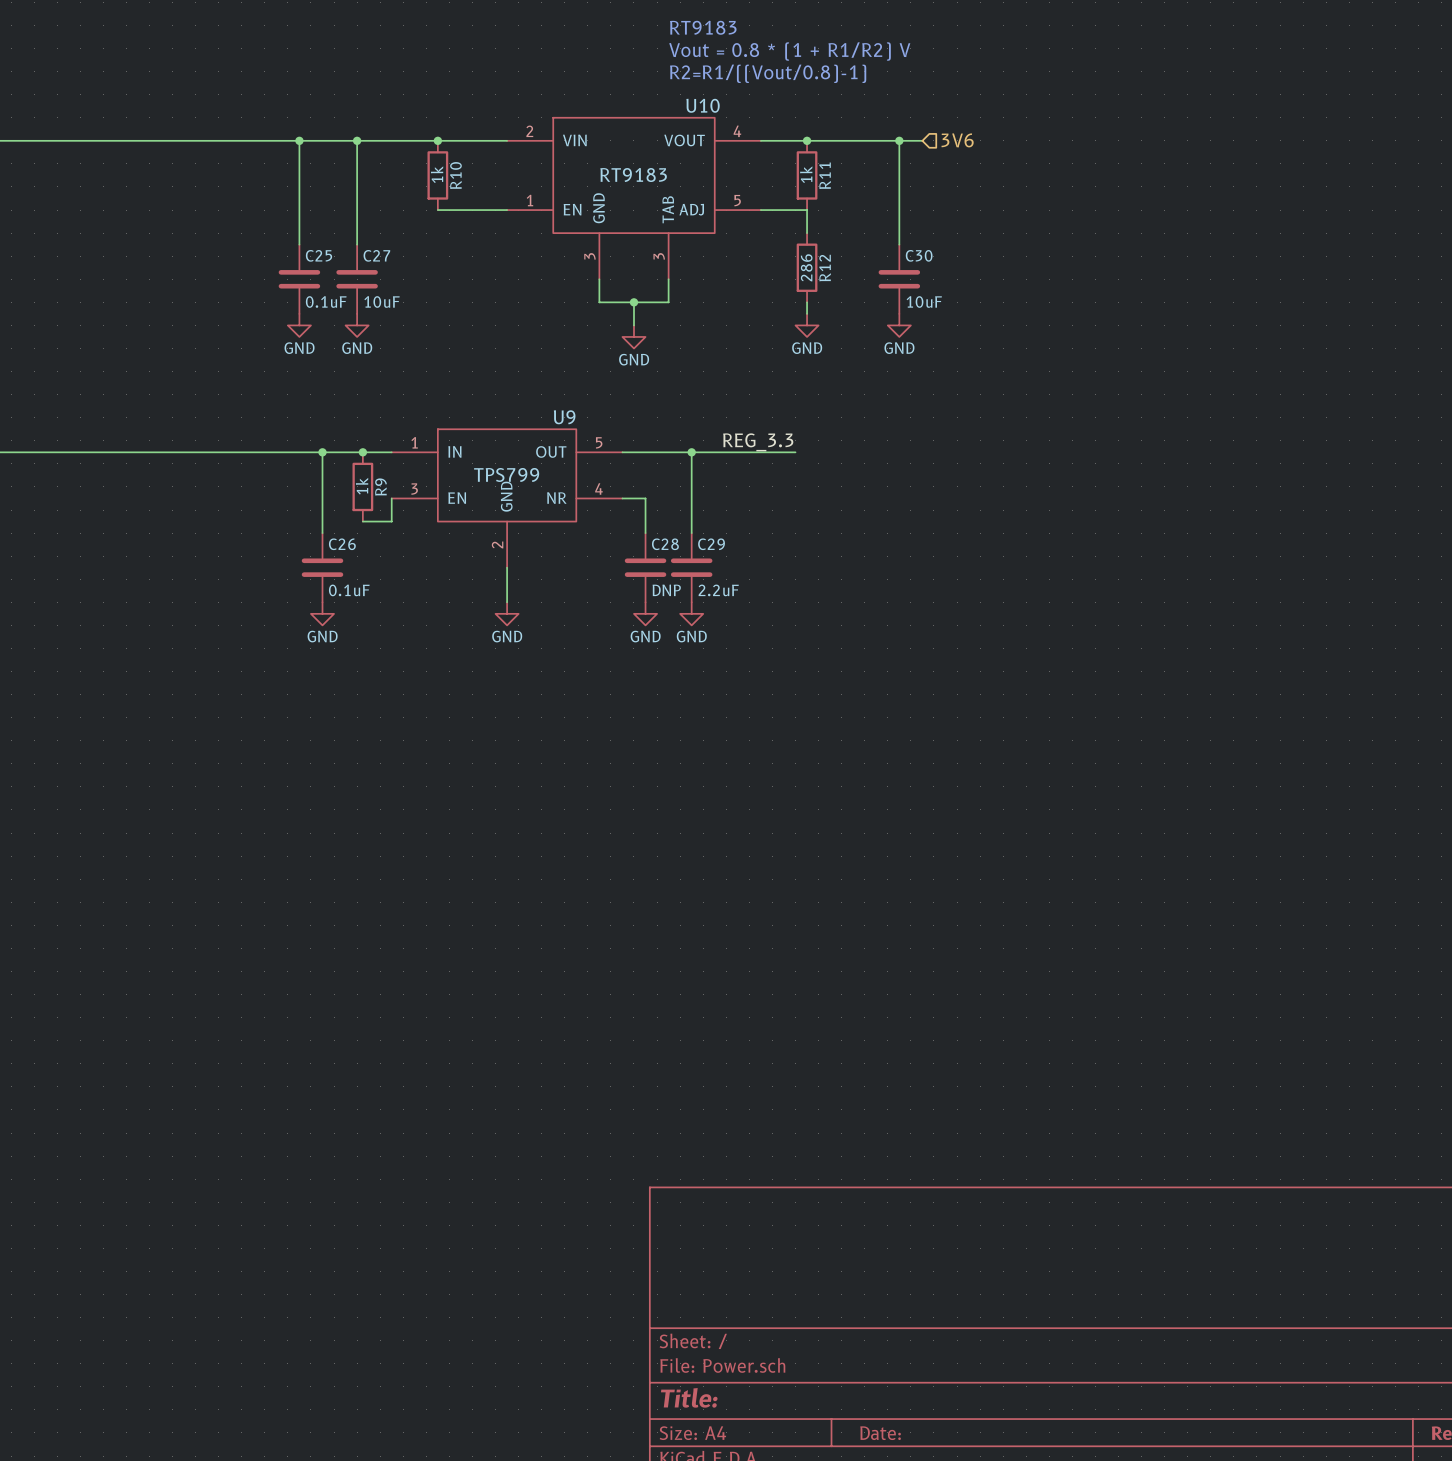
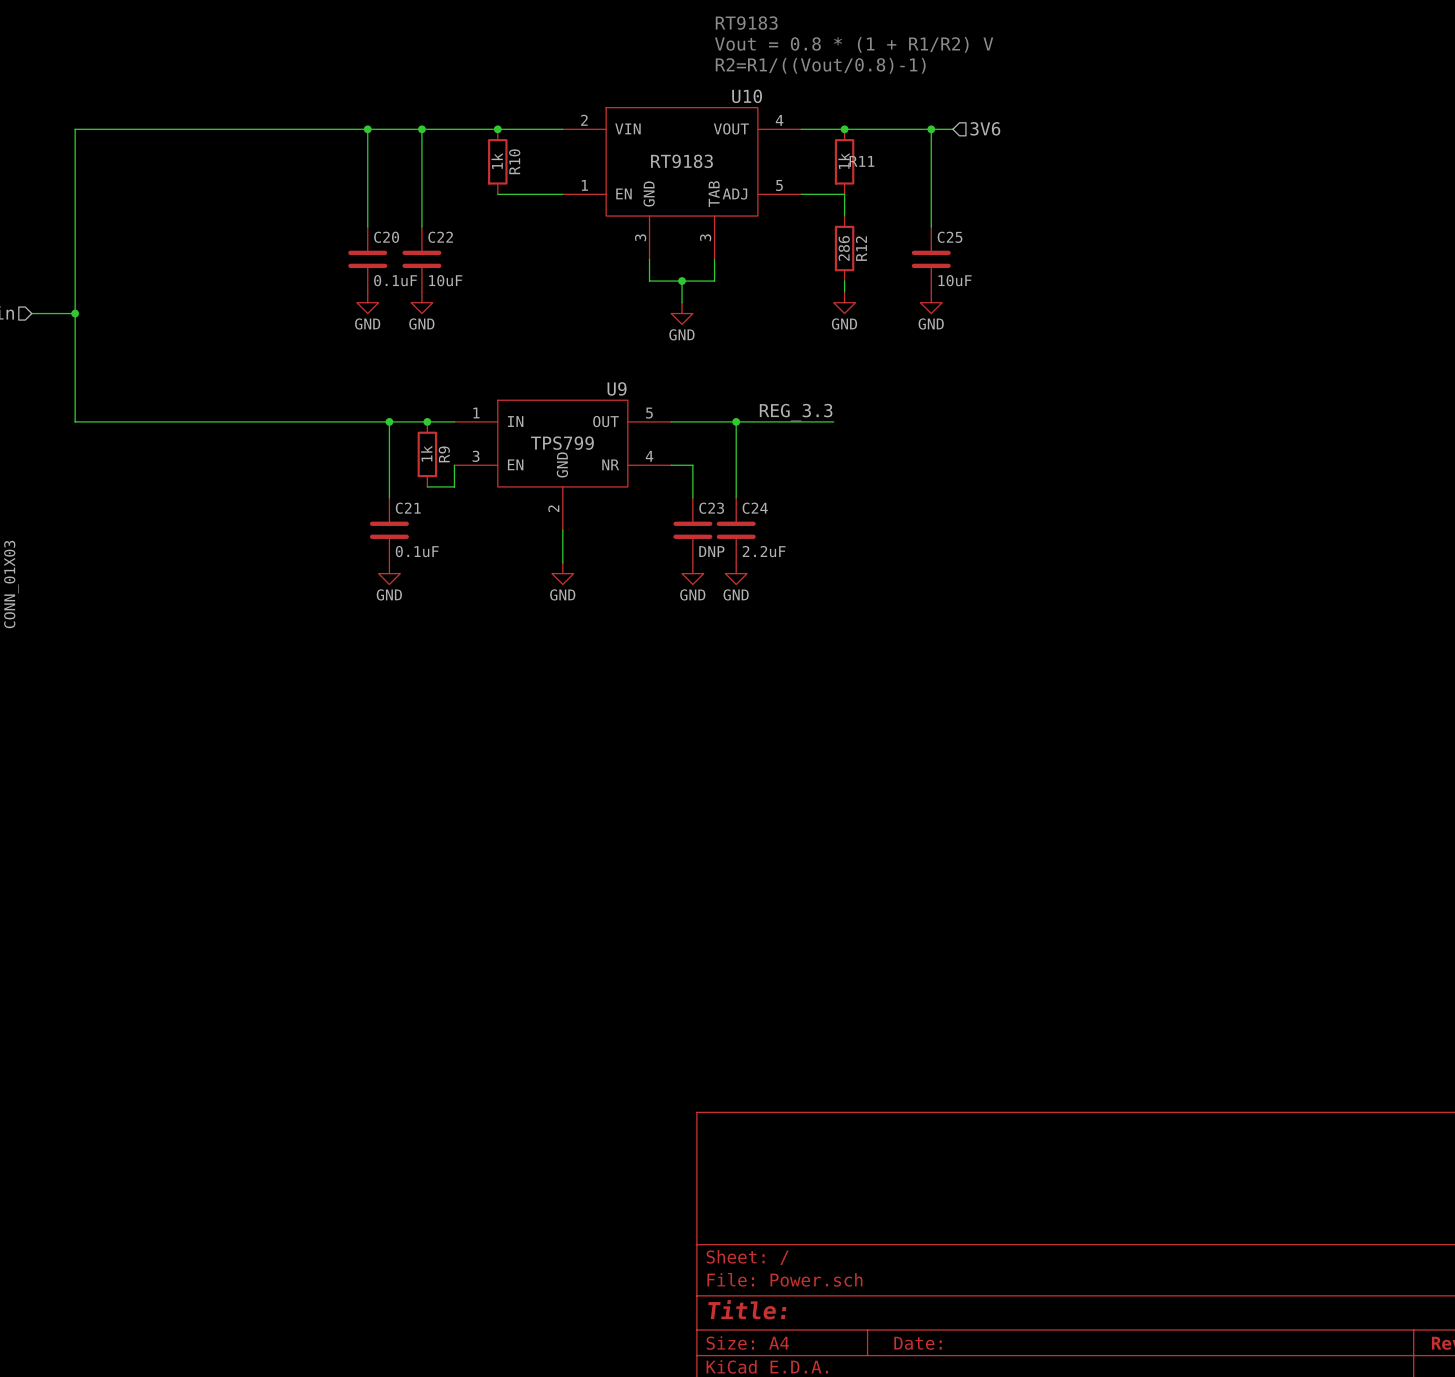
R11 name rotation: 0° (825, 175) -> 90° clockwise (861, 161)
C25 name: C25 (319, 255) -> C20 (386, 237)
C27 name: C27 (376, 255) -> C22 (440, 237)
C30 name: C30 (919, 255) -> C25 (950, 237)
C26 name: C26 (342, 544) -> C21 (408, 508)
C28 name: C28 (665, 544) -> C23 (711, 508)
C29 name: C29 (711, 544) -> C24 (755, 508)

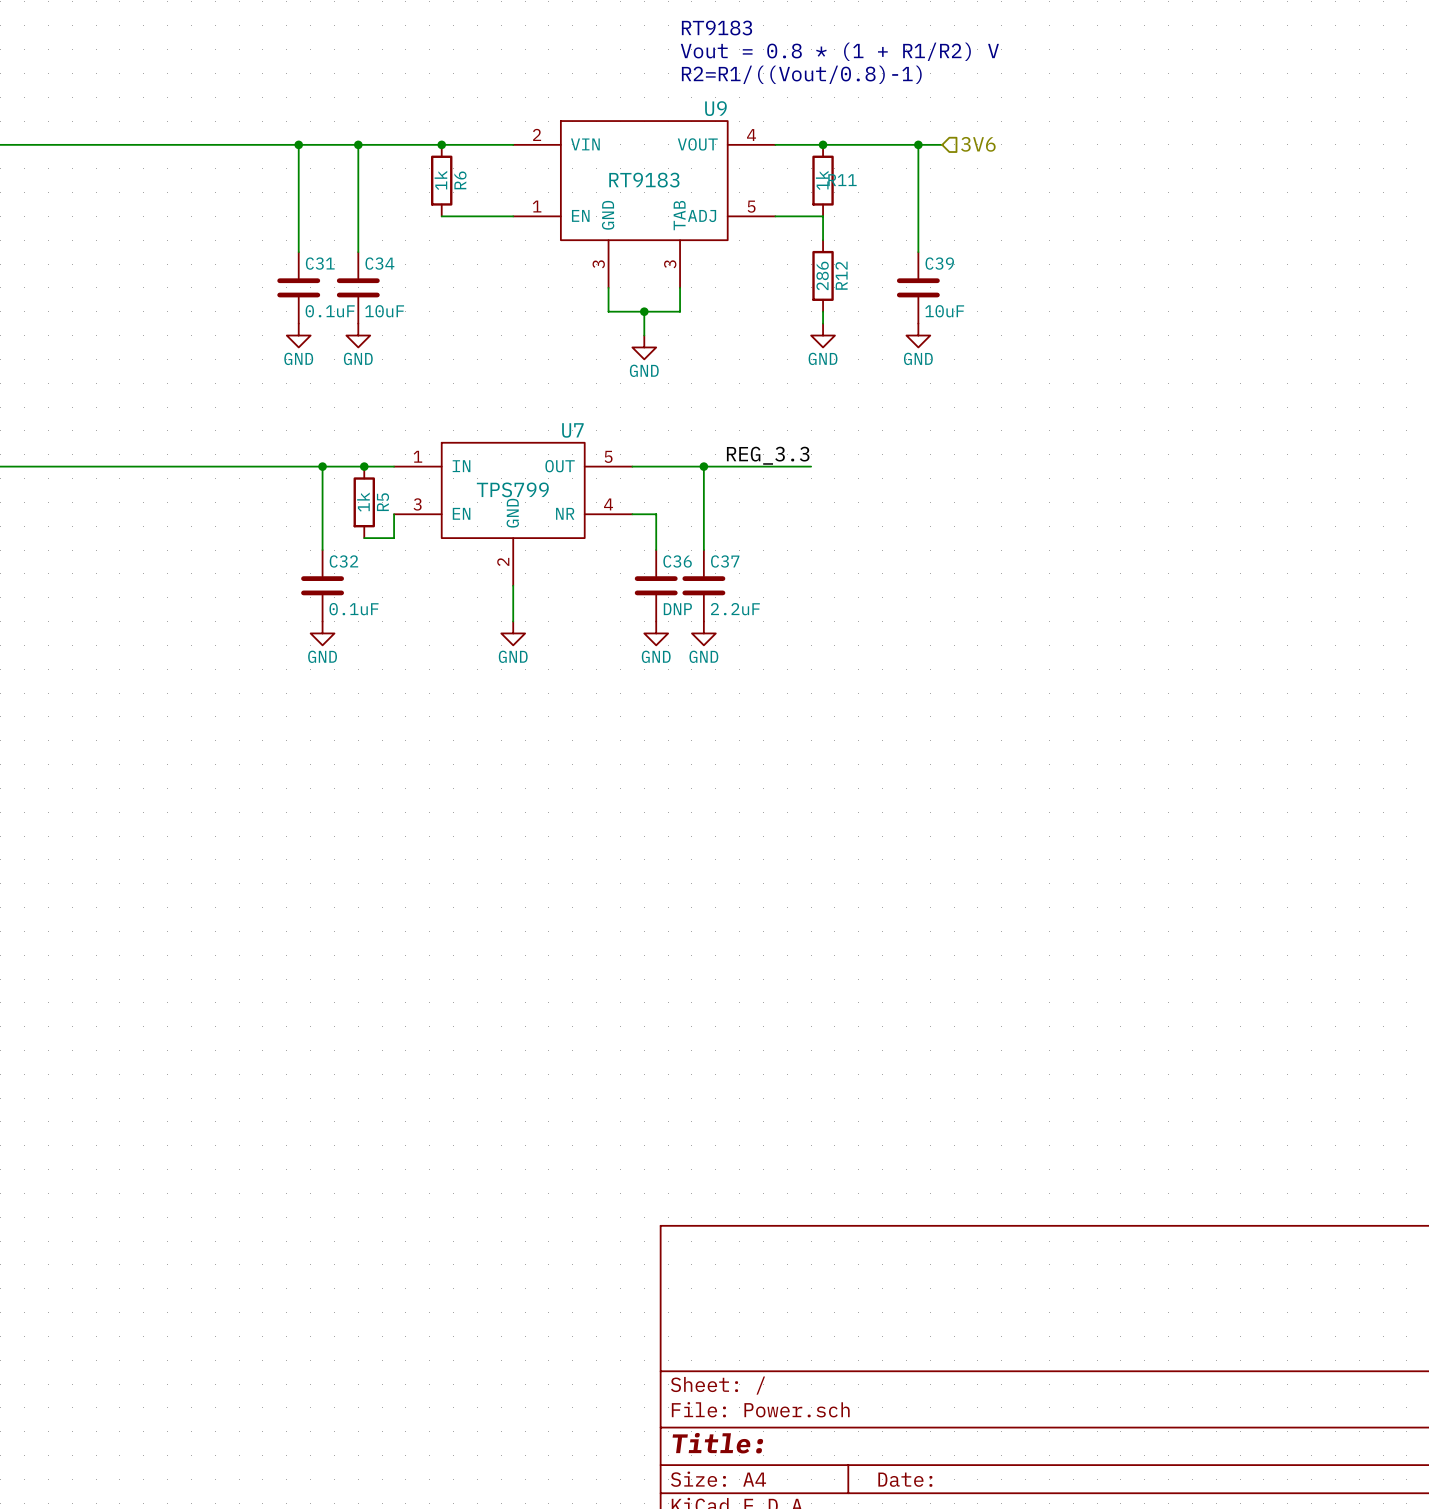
U10 name: U10 (747, 96) -> U9 (715, 108)
R10 name: R10 (514, 161) -> R6 (460, 180)
C20 name: C20 (386, 237) -> C31 (320, 263)
C22 name: C22 (440, 237) -> C34 (379, 263)
C25 name: C25 (950, 237) -> C39 (939, 263)
U9 name: U9 (617, 388) -> U7 (572, 430)
R9 name: R9 (444, 454) -> R5 (382, 502)
C21 name: C21 (408, 508) -> C32 (343, 561)
C23 name: C23 (711, 508) -> C36 (677, 561)
C24 name: C24 (755, 508) -> C37 (725, 561)

